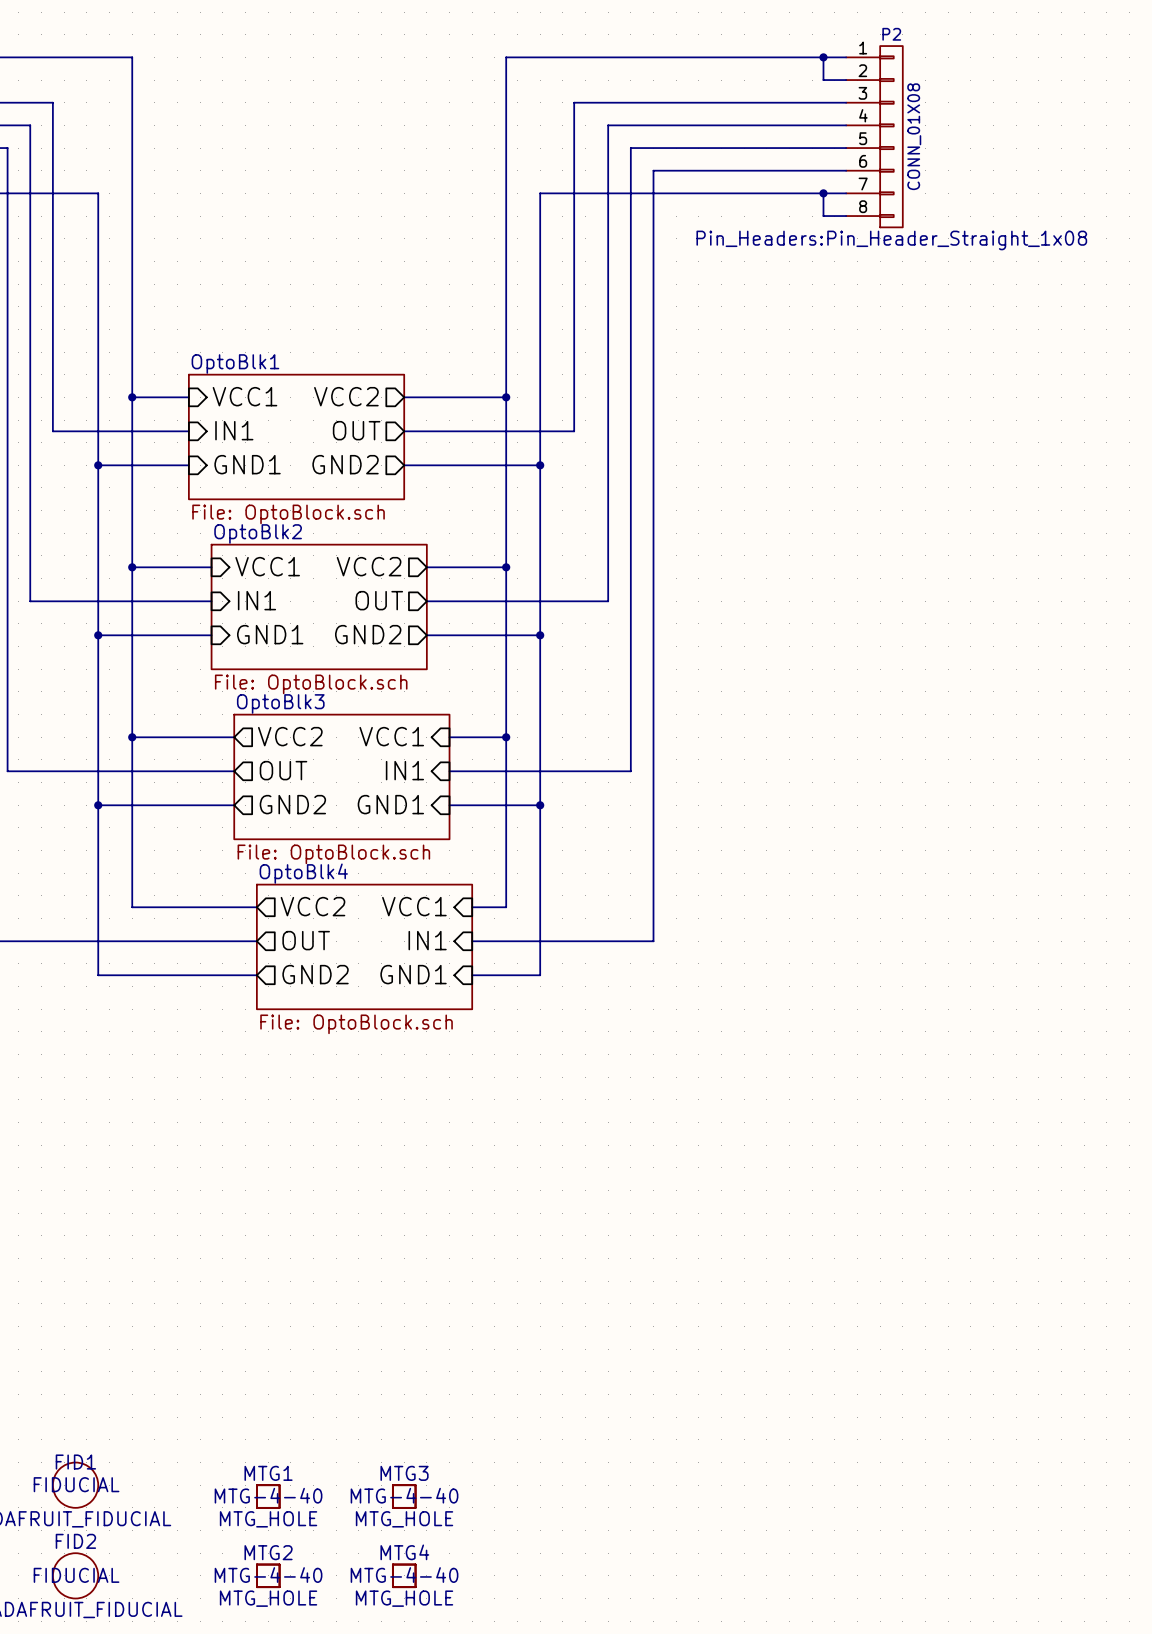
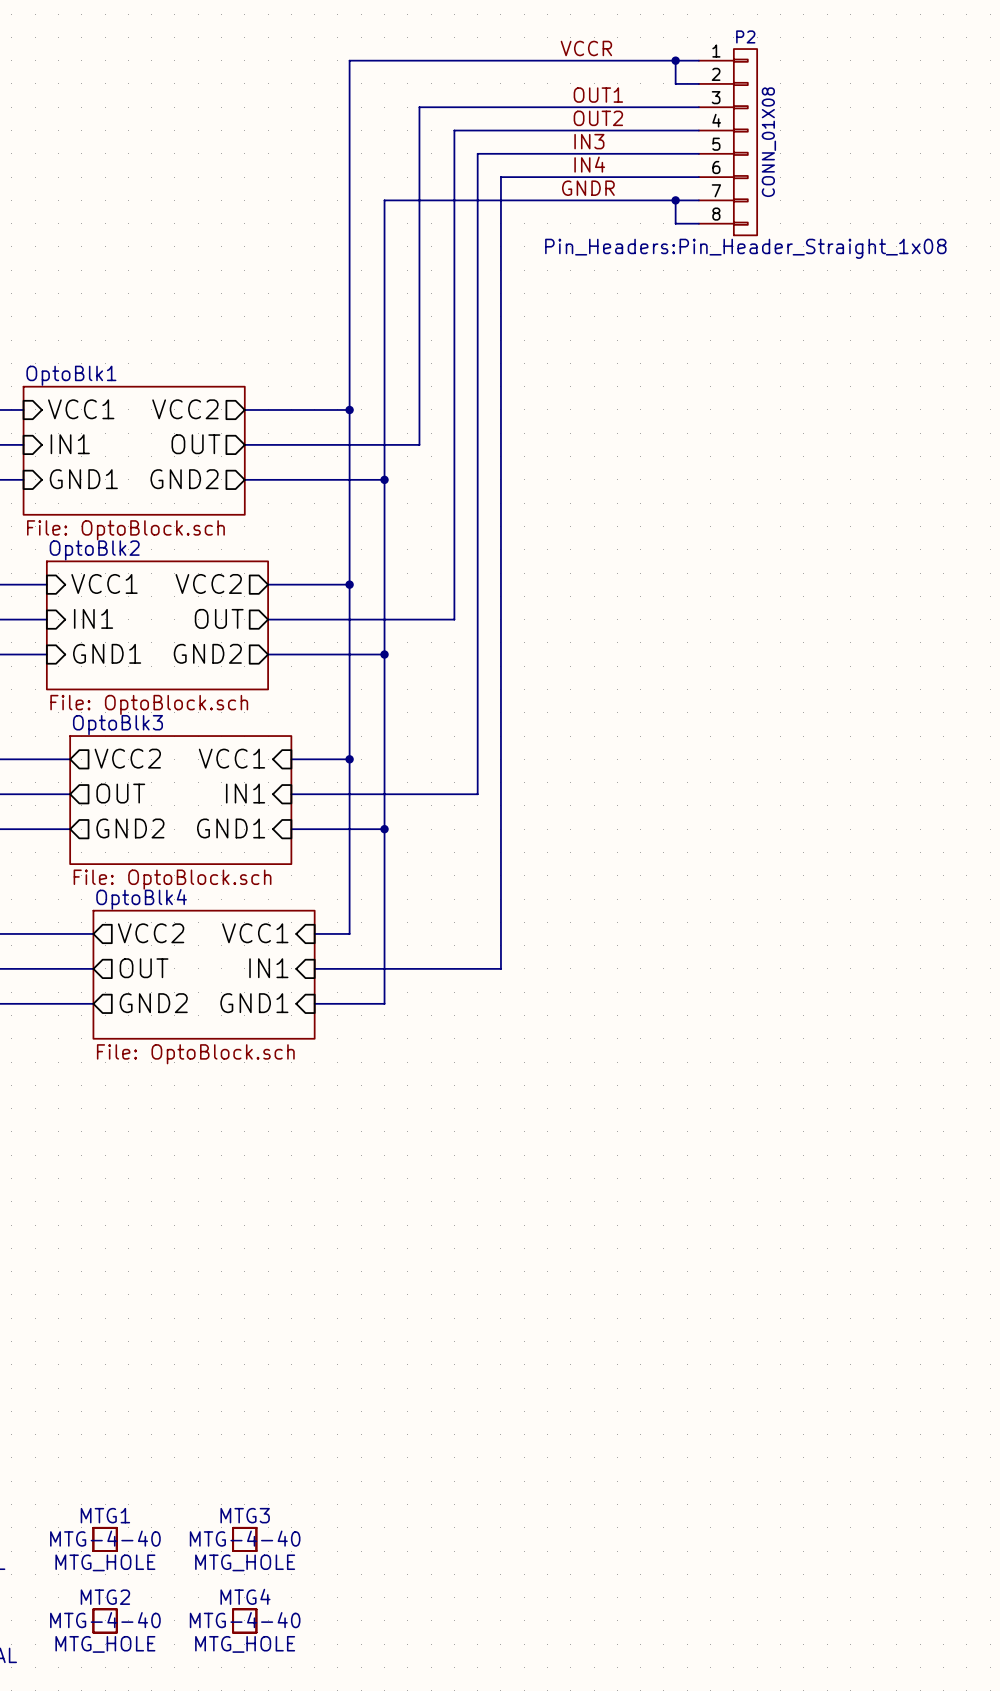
label: none -> VCCR (586, 48)
label: none -> OUT1 (598, 95)
label: none -> OUT2 (598, 118)
label: none -> IN3 (589, 141)
label: none -> IN4 (589, 164)
label: none -> GNDR (588, 188)

